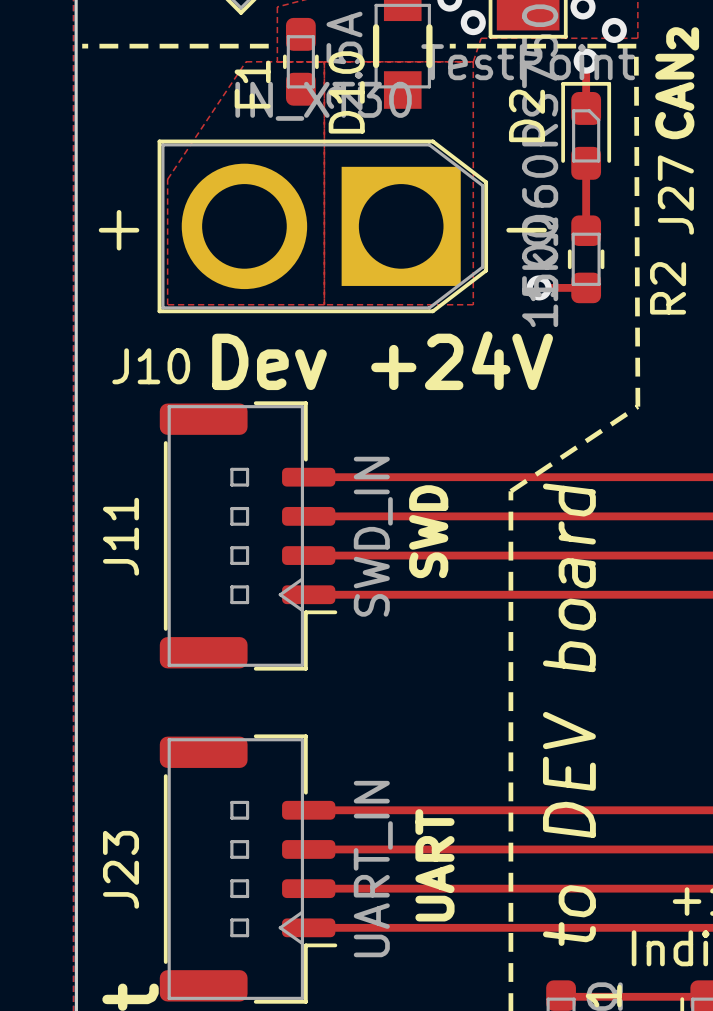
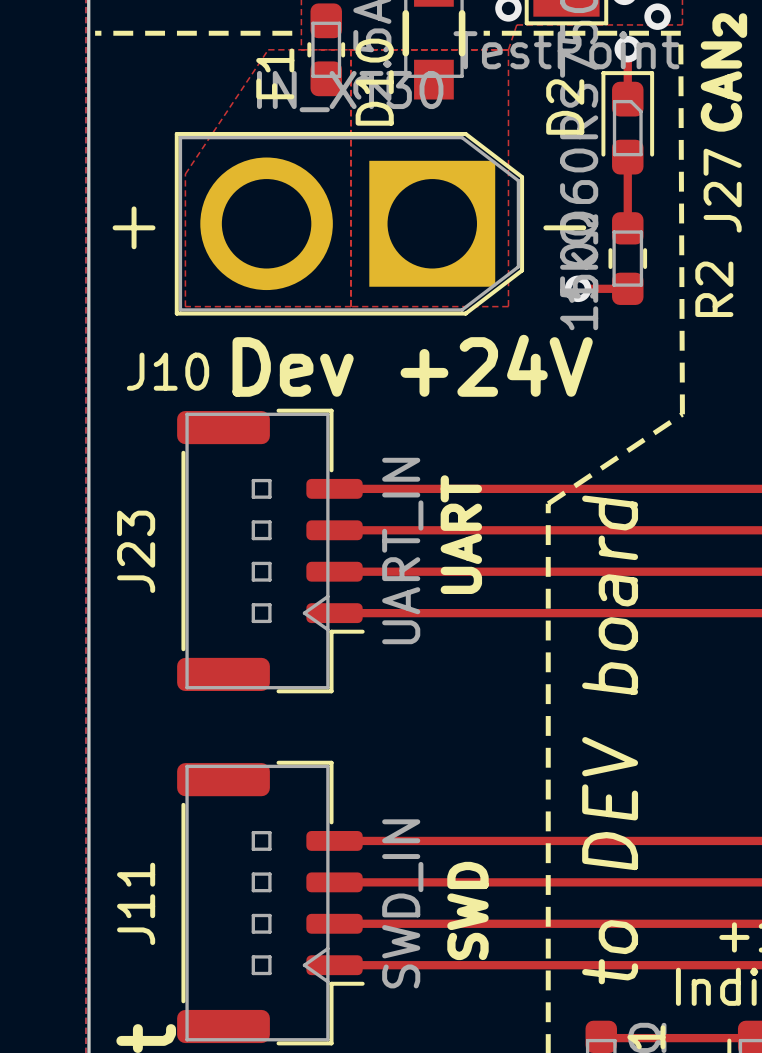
text: SWD (428, 531) -> UART (461, 534)
J11 name: J11 (121, 536) -> J23 (136, 551)
J11 value: SWD_IN (373, 536) -> UART_IN (402, 551)
text: UART (434, 865) -> SWD (467, 910)
J23 name: J23 (121, 869) -> J11 (136, 903)
J23 value: UART_IN (373, 869) -> SWD_IN (402, 903)

